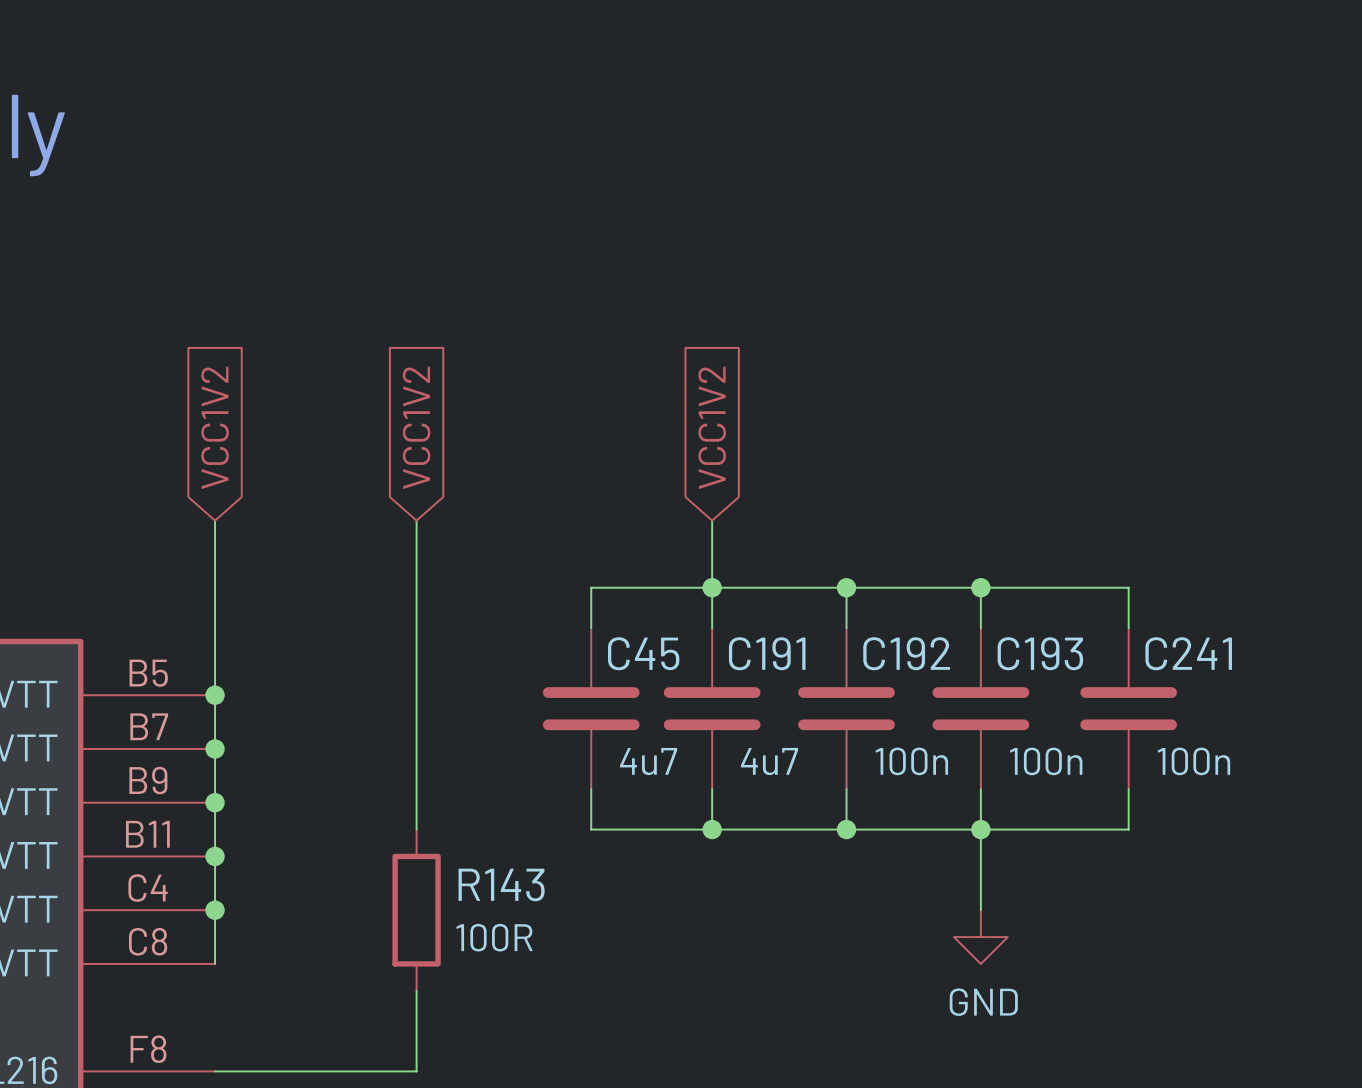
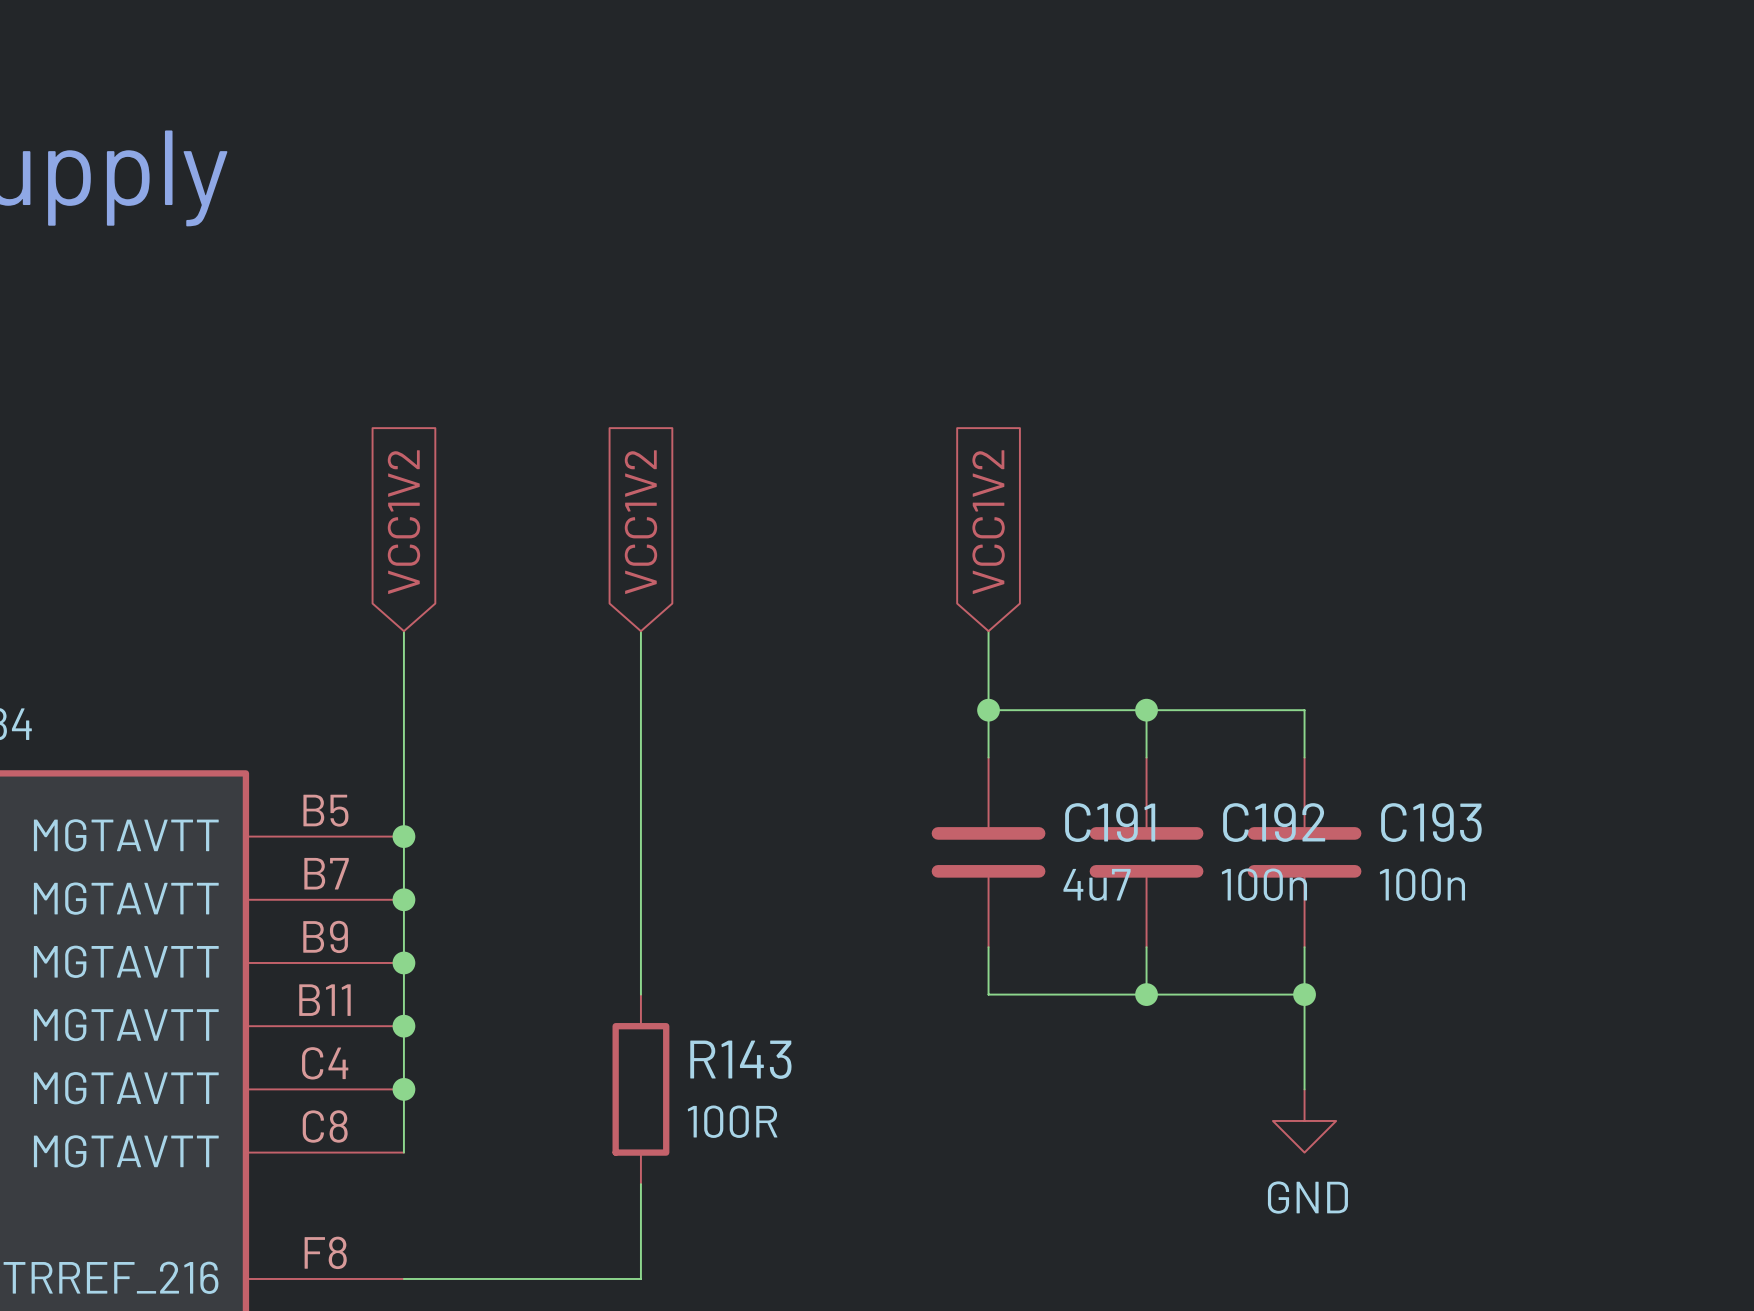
wire: (712, 587) (591, 587) (591, 628) -> none
wire: (980, 587) (1128, 587) (1128, 628) -> none
junction: (980, 587) -> none
C191 name position: C191 (767, 653) -> C191 (1110, 822)
C192 name position: C192 (906, 653) -> C192 (1274, 822)
C193 name position: C193 (1040, 653) -> C193 (1431, 822)
C45: (591, 708) -> none
C241: (1128, 708) -> none
C191 text position: 4u7 (769, 761) -> 4u7 (1097, 884)
C192 text position: 100n (911, 761) -> 100n (1264, 884)
C193 text position: 100n (1046, 761) -> 100n (1422, 884)
wire: (591, 789) (591, 829) (712, 829) -> none
wire: (1128, 789) (1128, 829) (980, 829) -> none
junction: (712, 829) -> none

